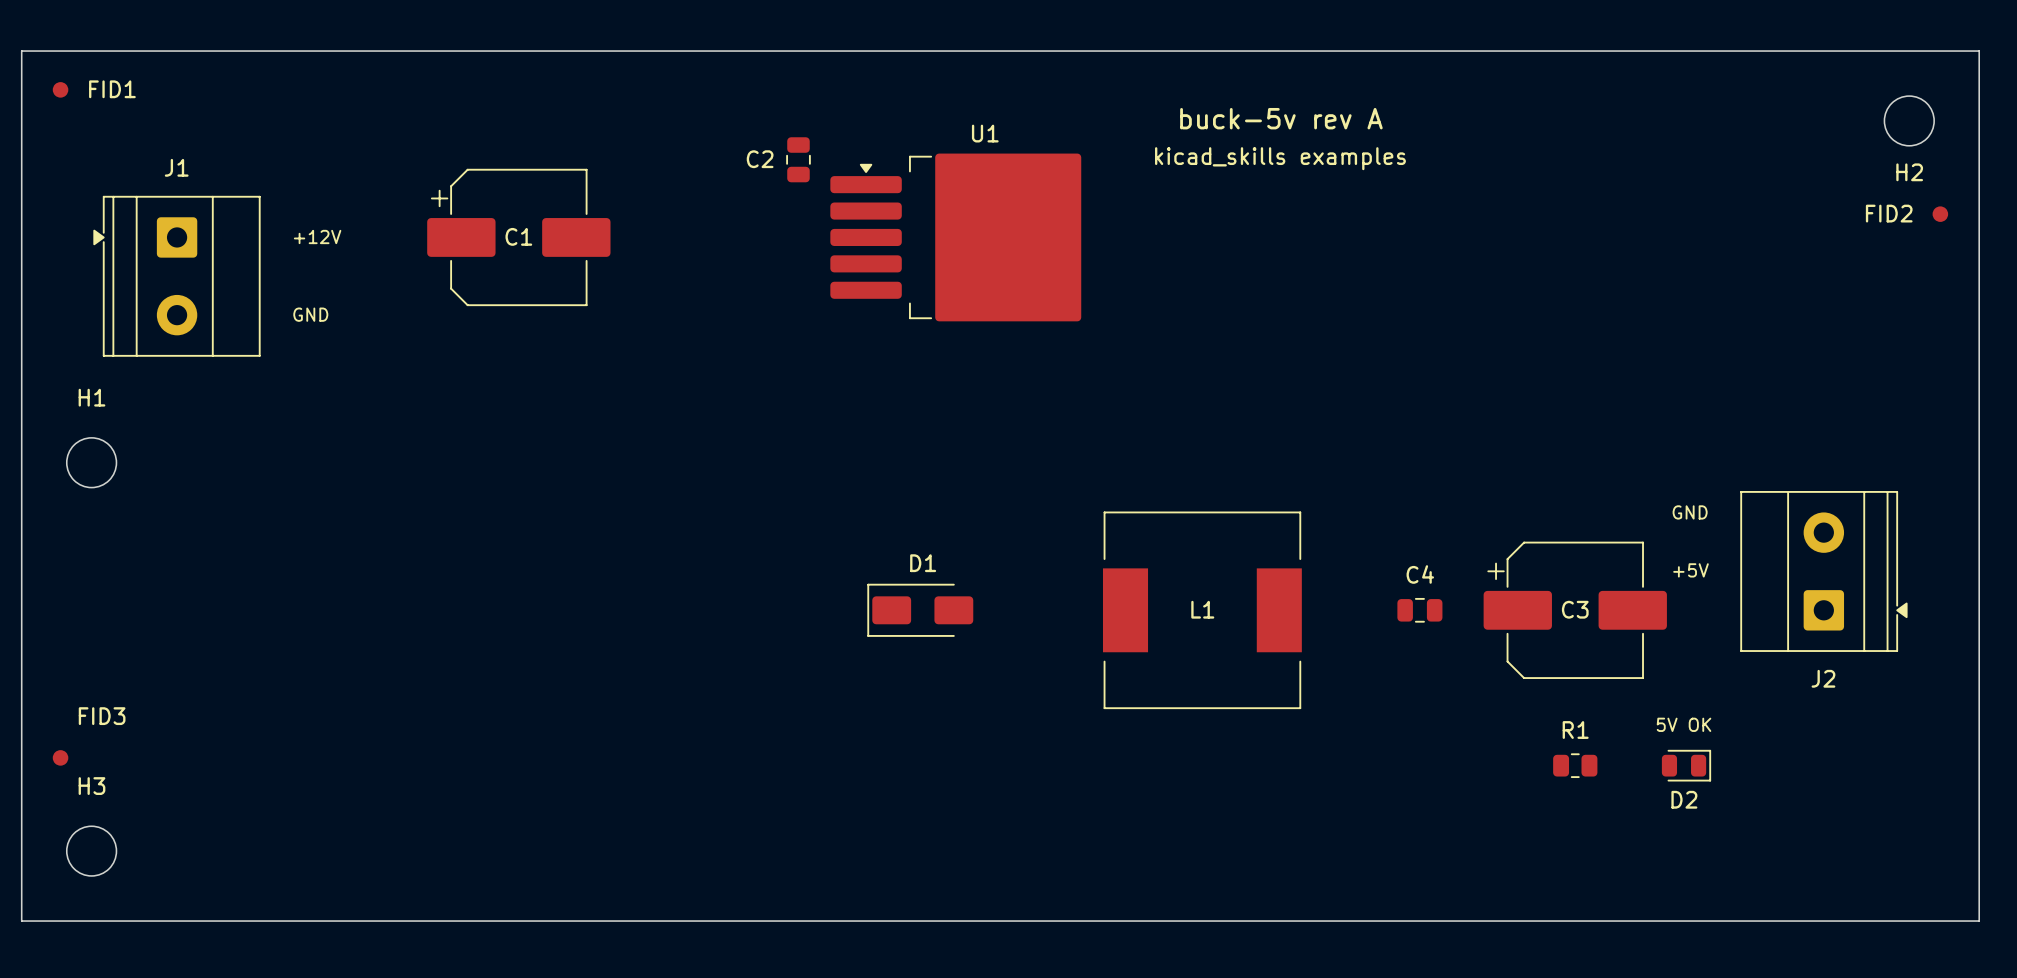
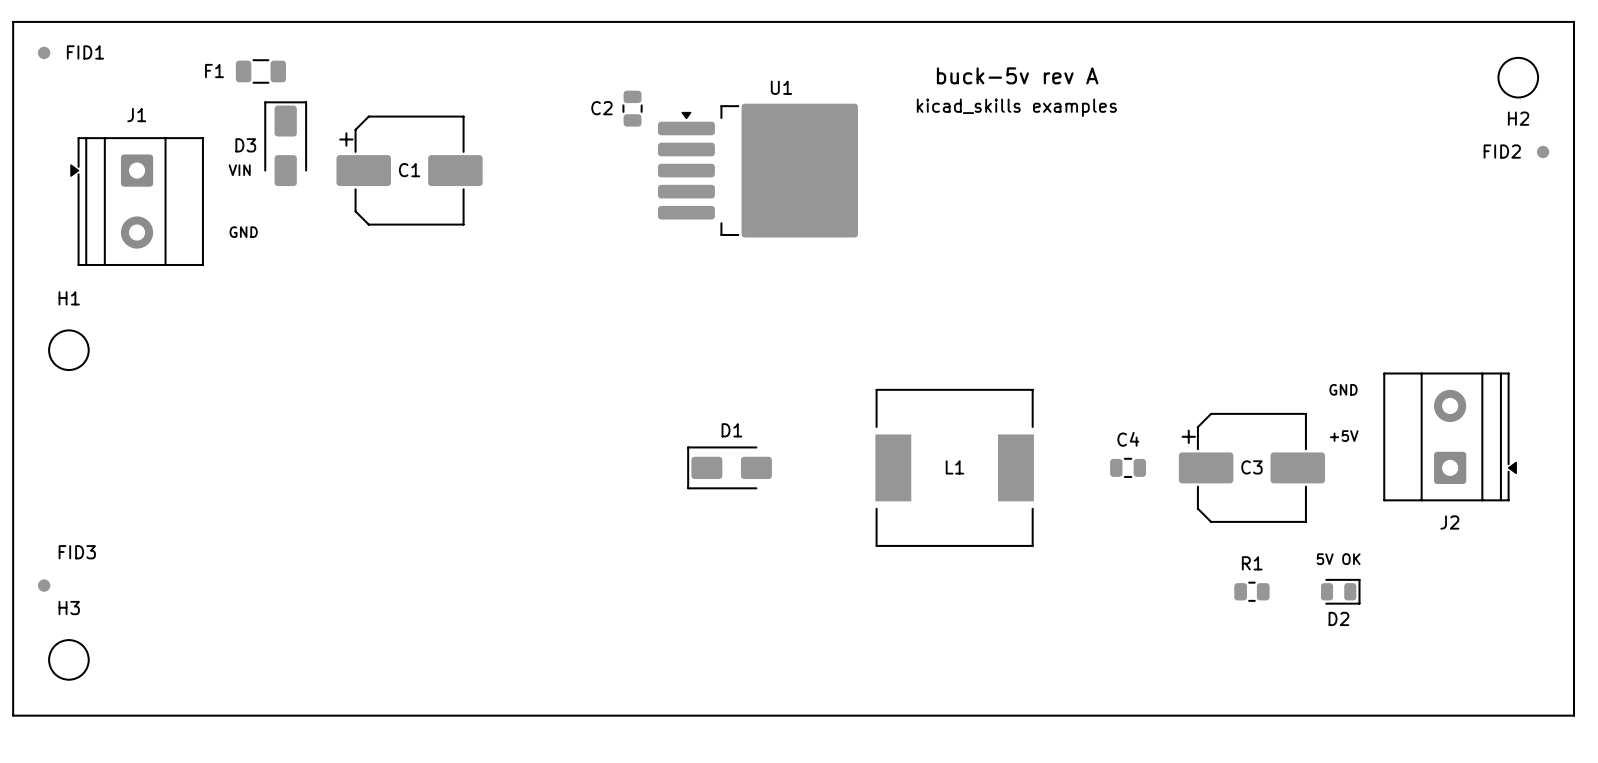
F1: none -> (260, 71)
D3: none -> (285, 143)
text: +12V (317, 236) -> VIN (239, 170)

